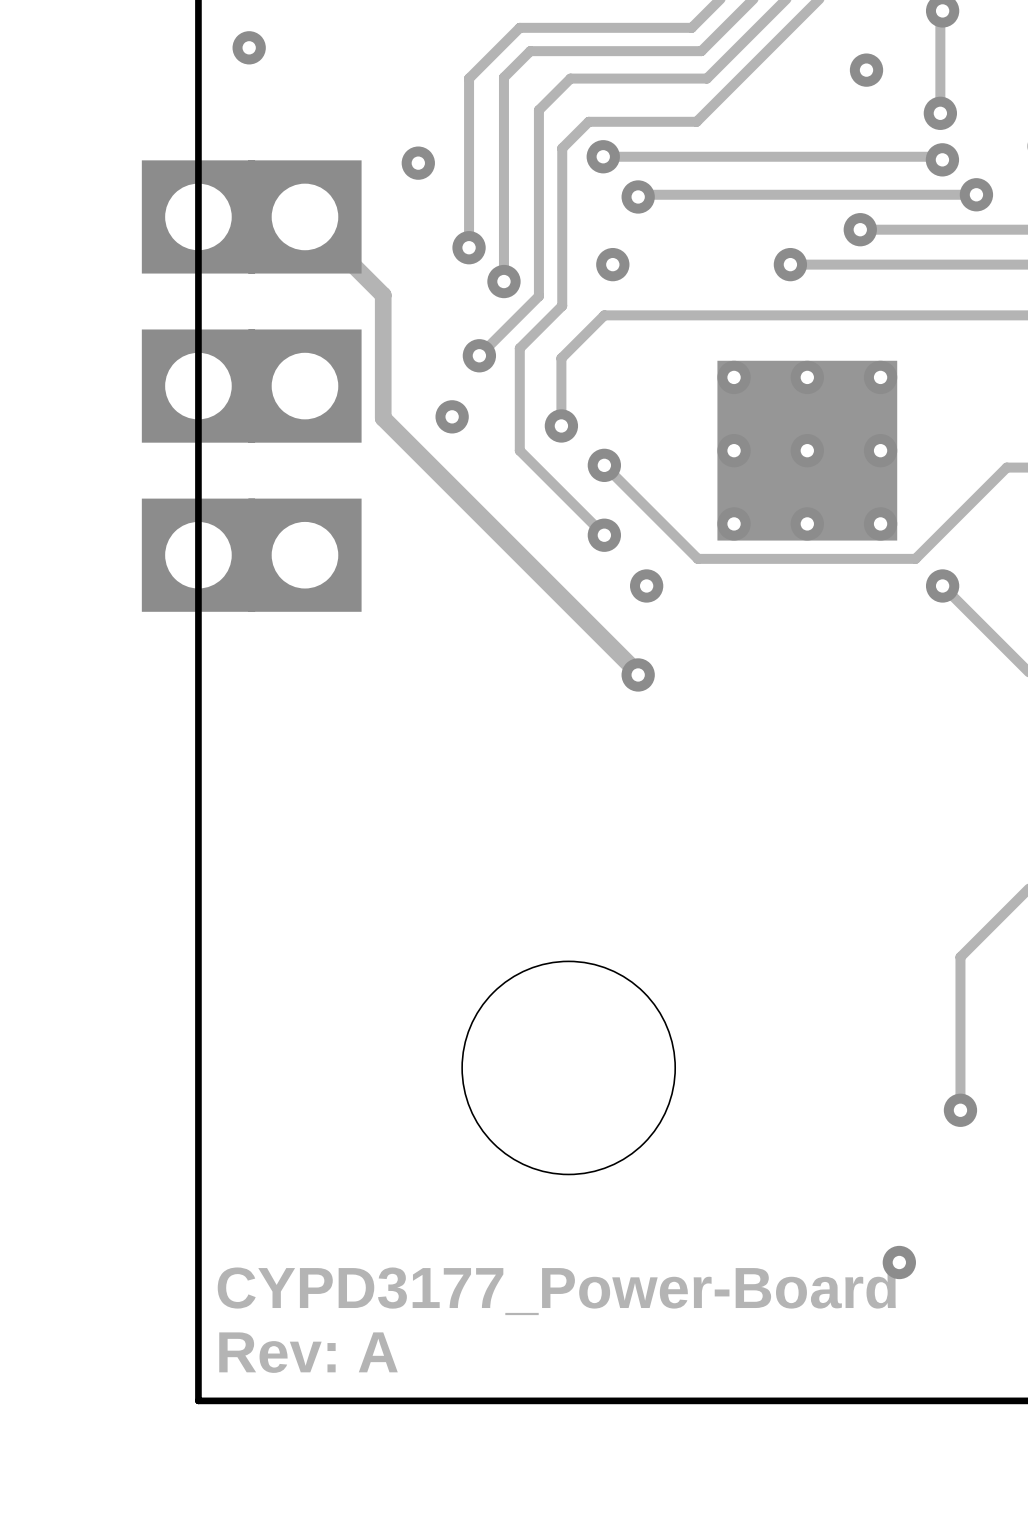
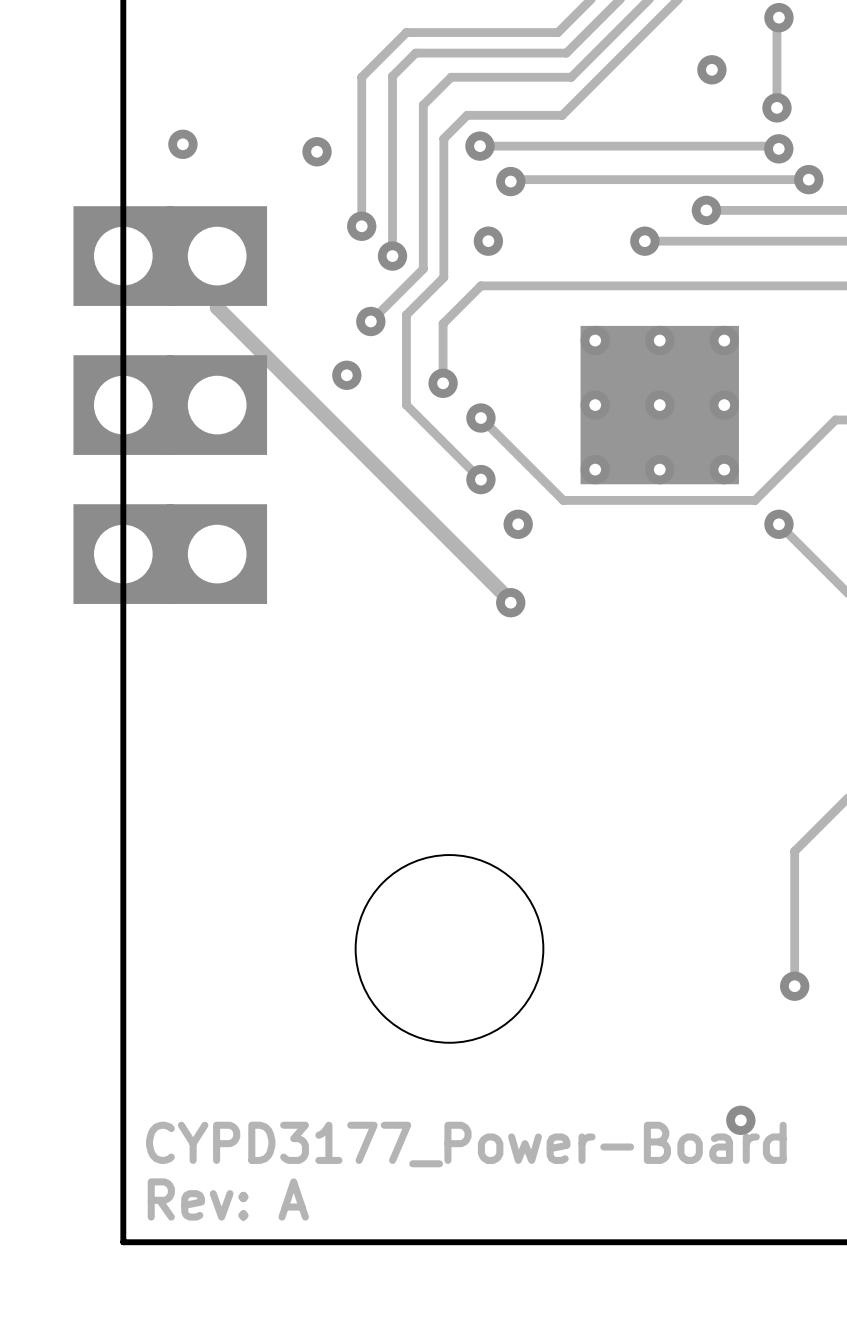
via: (249, 47) -> none
via: none -> (182, 144)
track: (304, 216) (383, 295) (383, 418) -> (217, 256) (217, 307) (286, 376)
part position: (251, 386) -> (170, 405)

